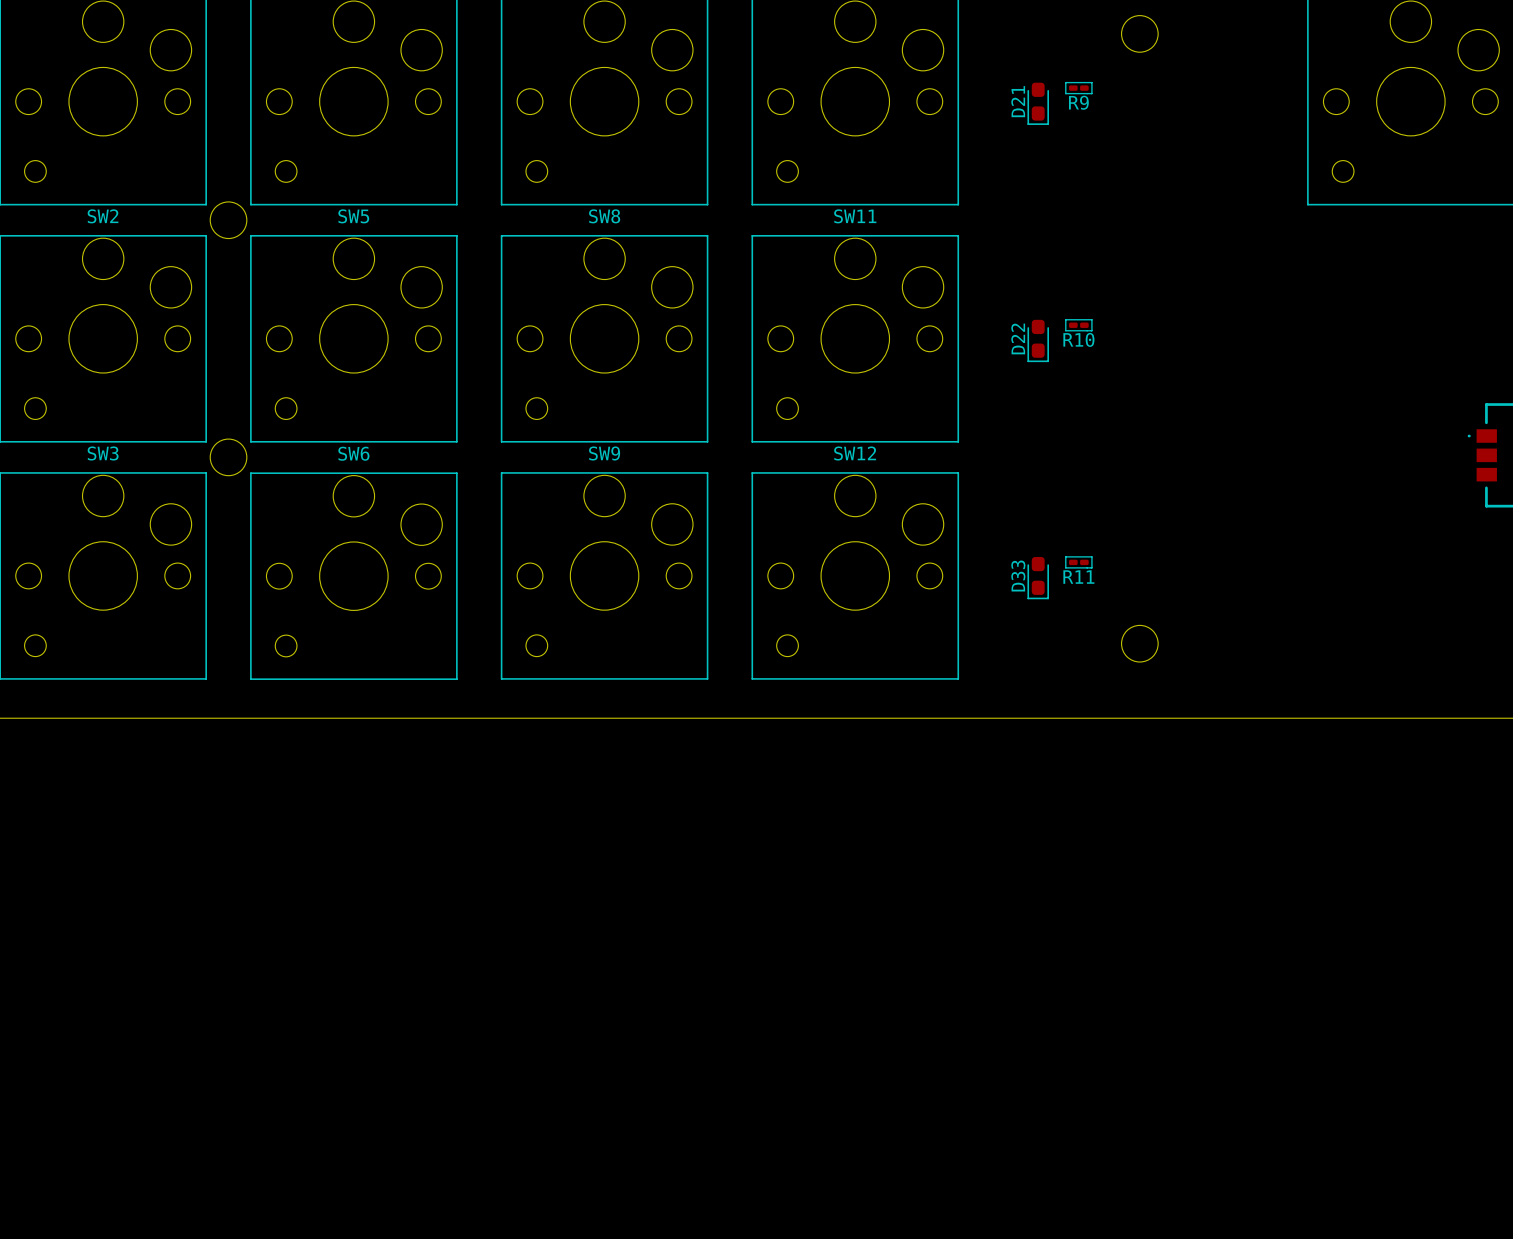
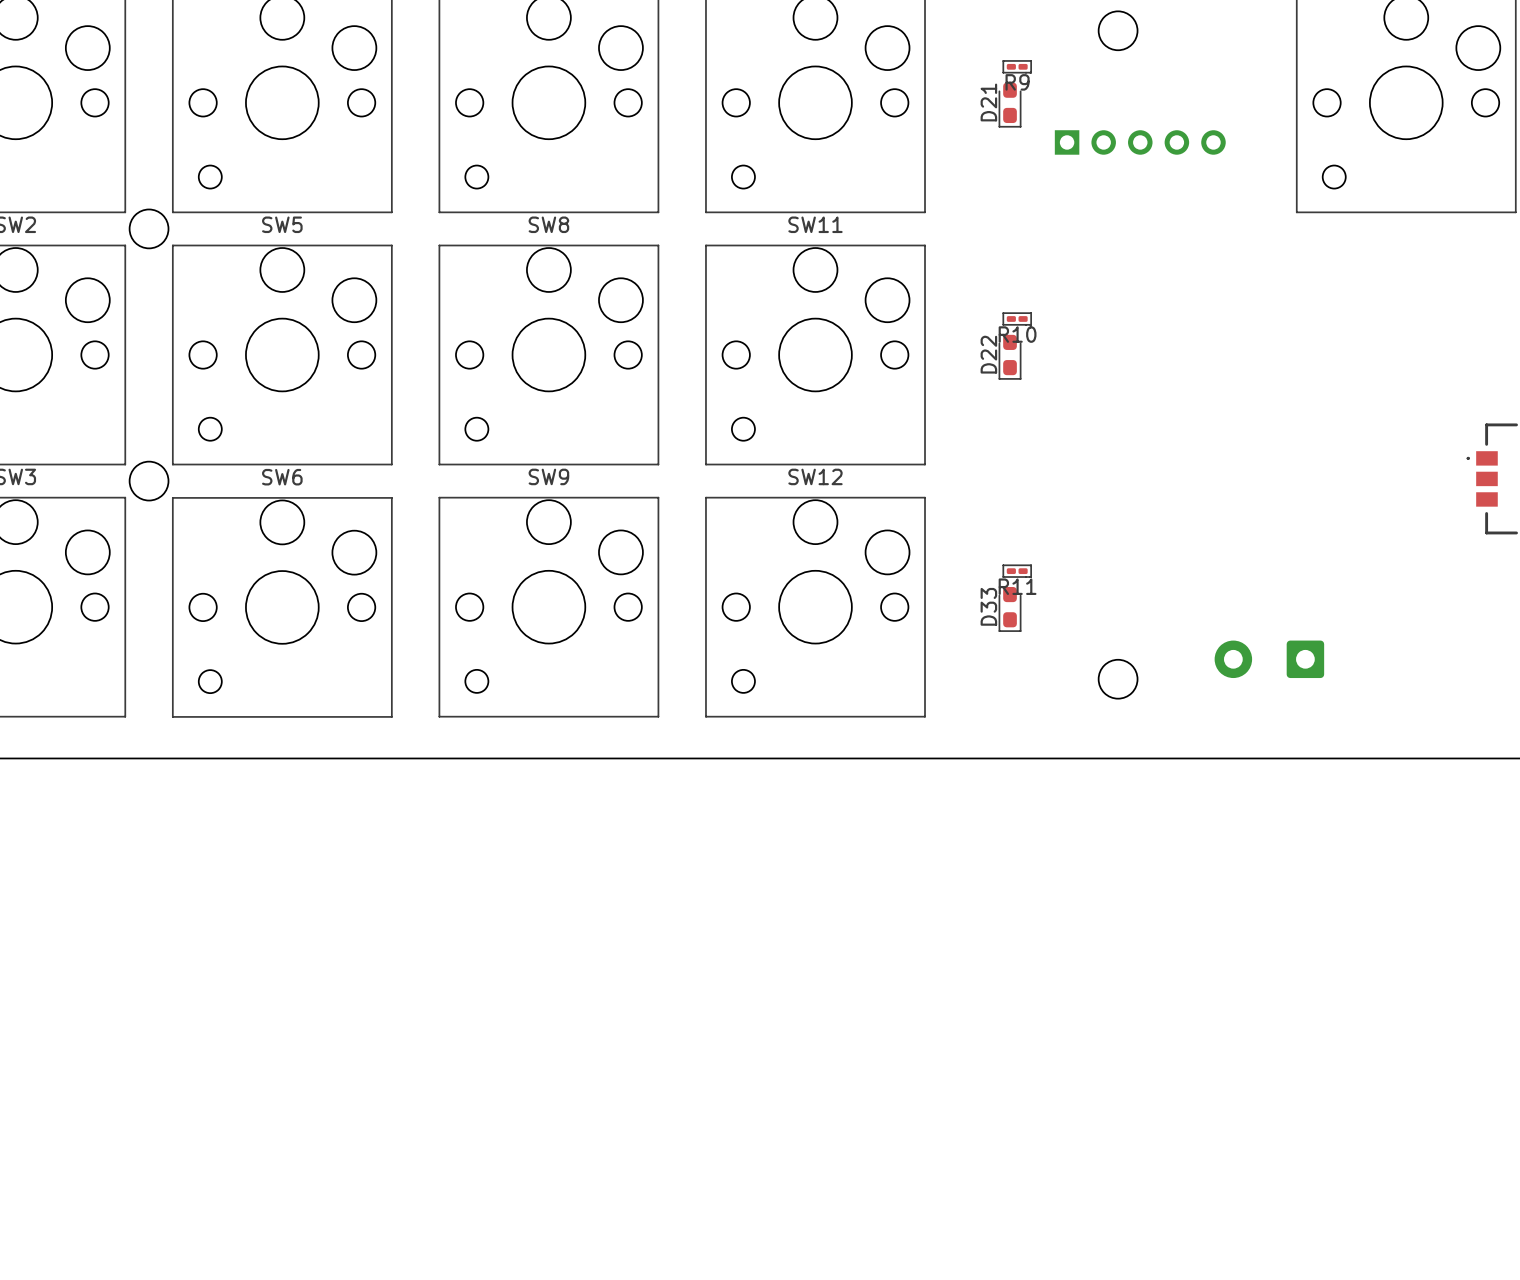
R9 position: (1078, 88) -> (1017, 66)
part: none -> (1140, 142)
R10 position: (1078, 325) -> (1017, 318)
R11 position: (1078, 562) -> (1017, 571)
part: none -> (1269, 659)

